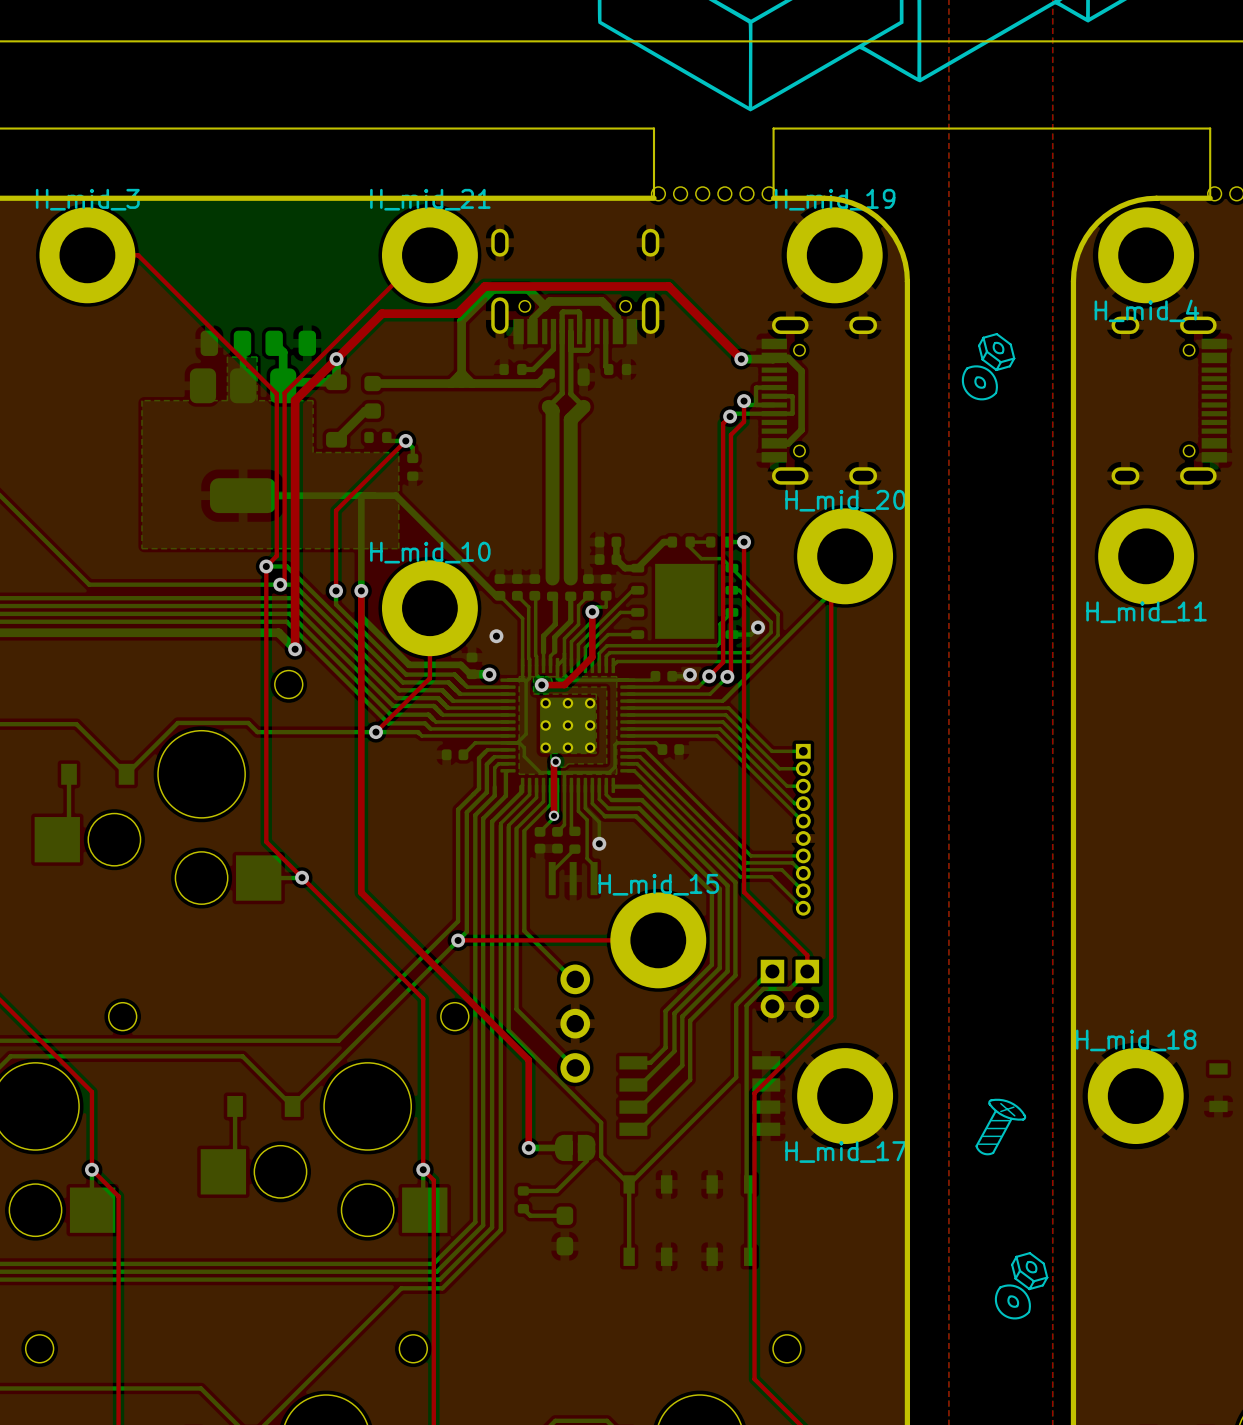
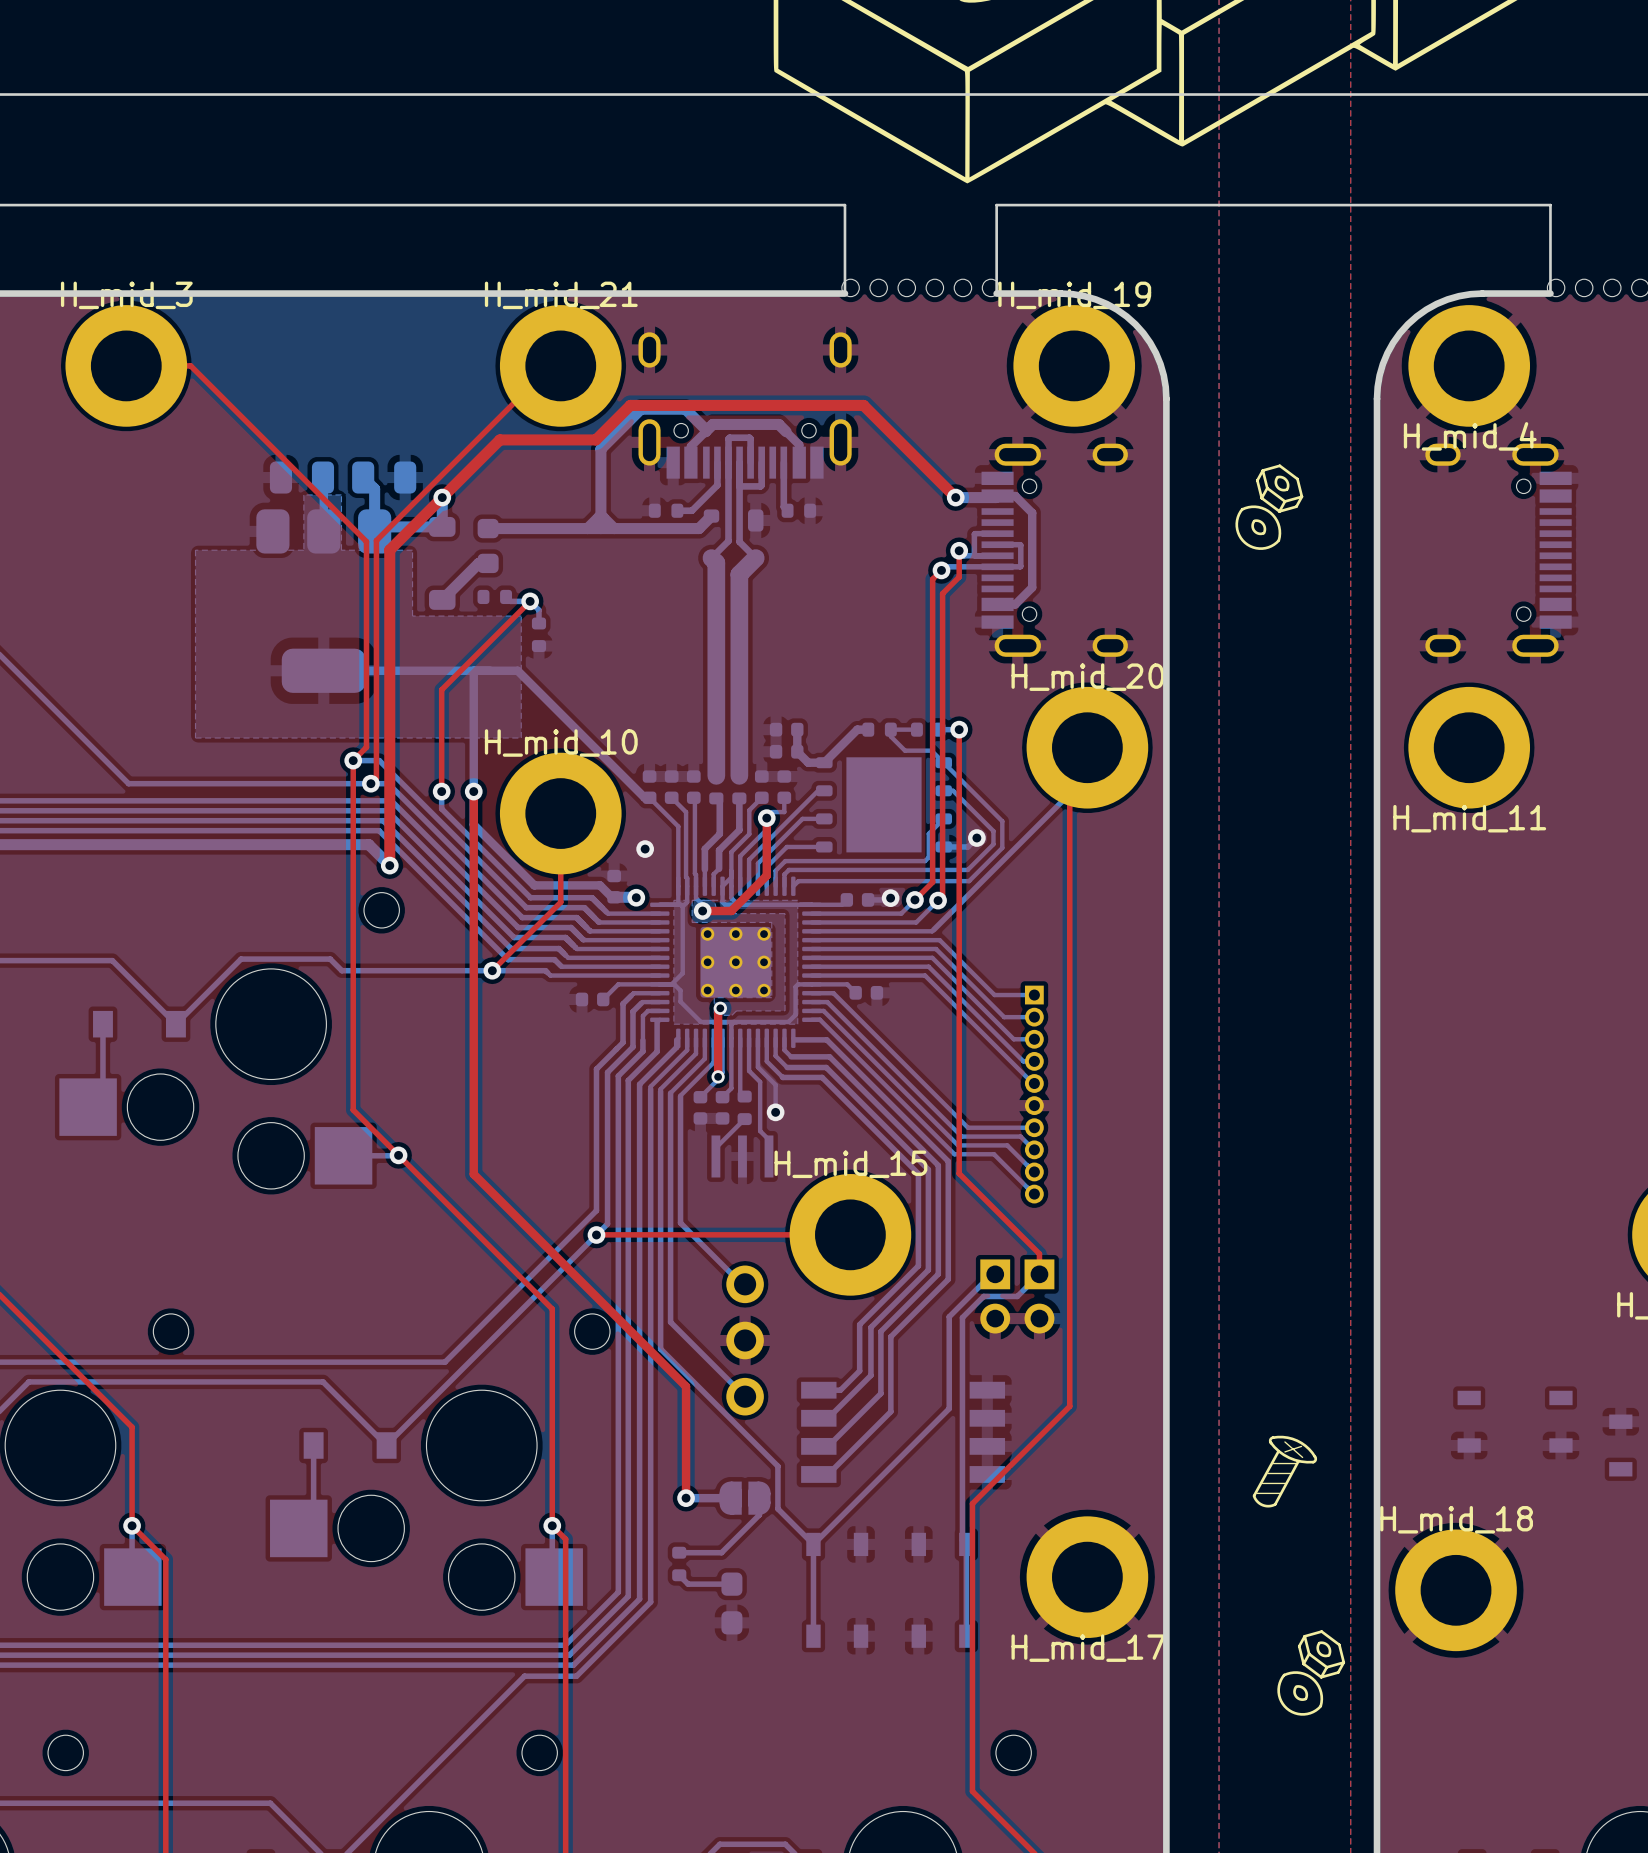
top track: (831, 1016) (754, 1093) (754, 1152) -> (1069, 1331) (1069, 1406) (972, 1503)
H_mid_17 position: (845, 1096) -> (1087, 1577)
H_mid_18 position: (1135, 1096) -> (1456, 1590)

